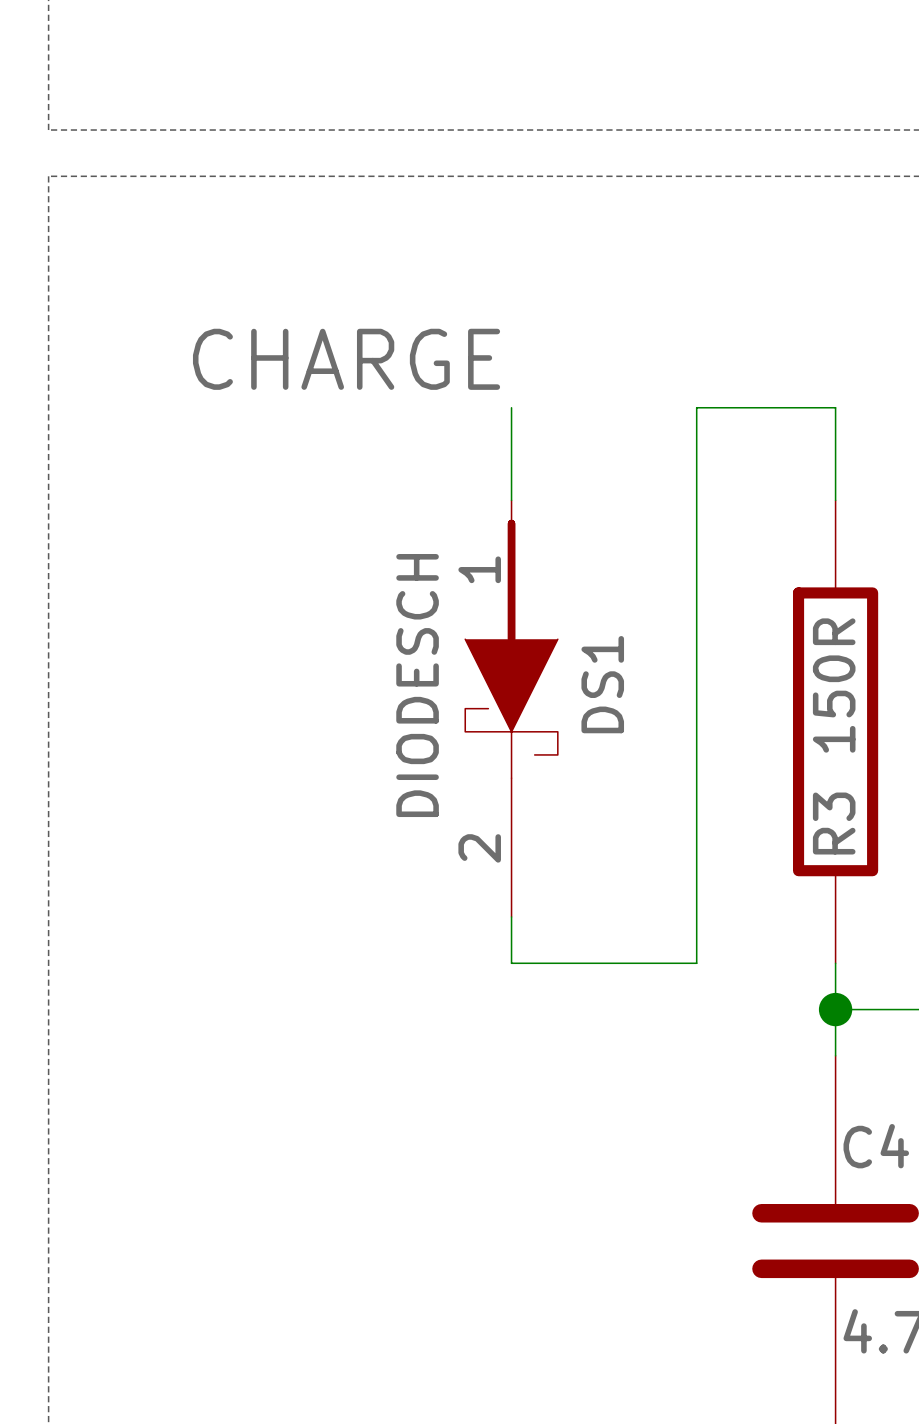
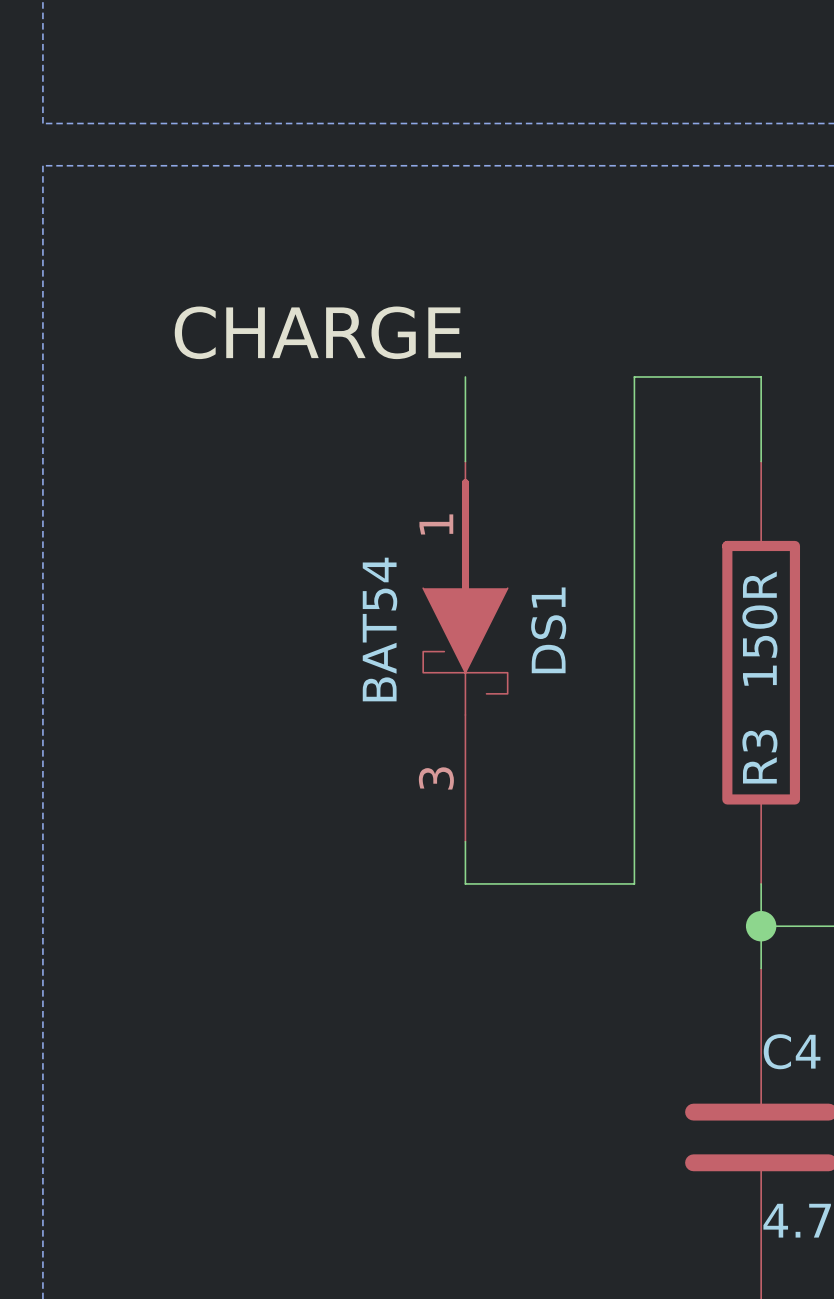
DS1 value: DIODESCH (417, 685) -> BAT54 (379, 629)
DS1 pin number: 2 (479, 848) -> 3 (436, 778)

